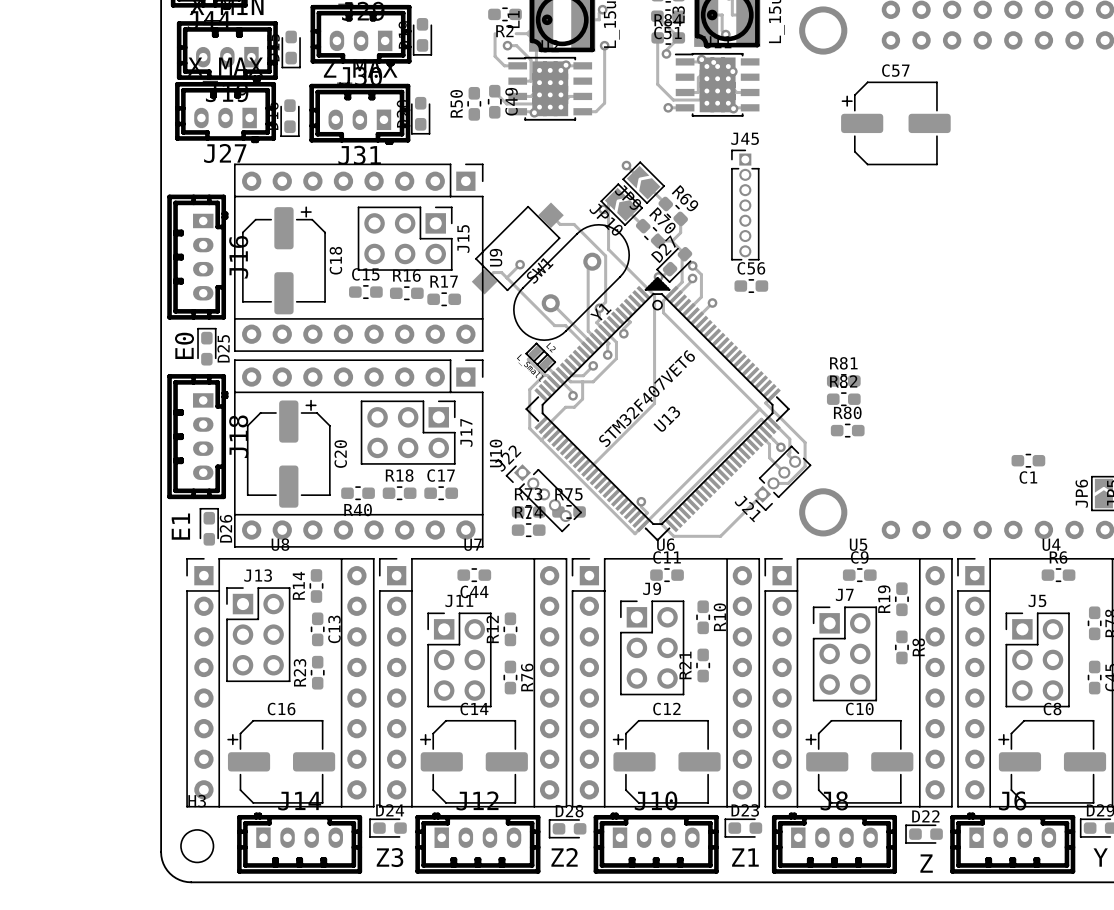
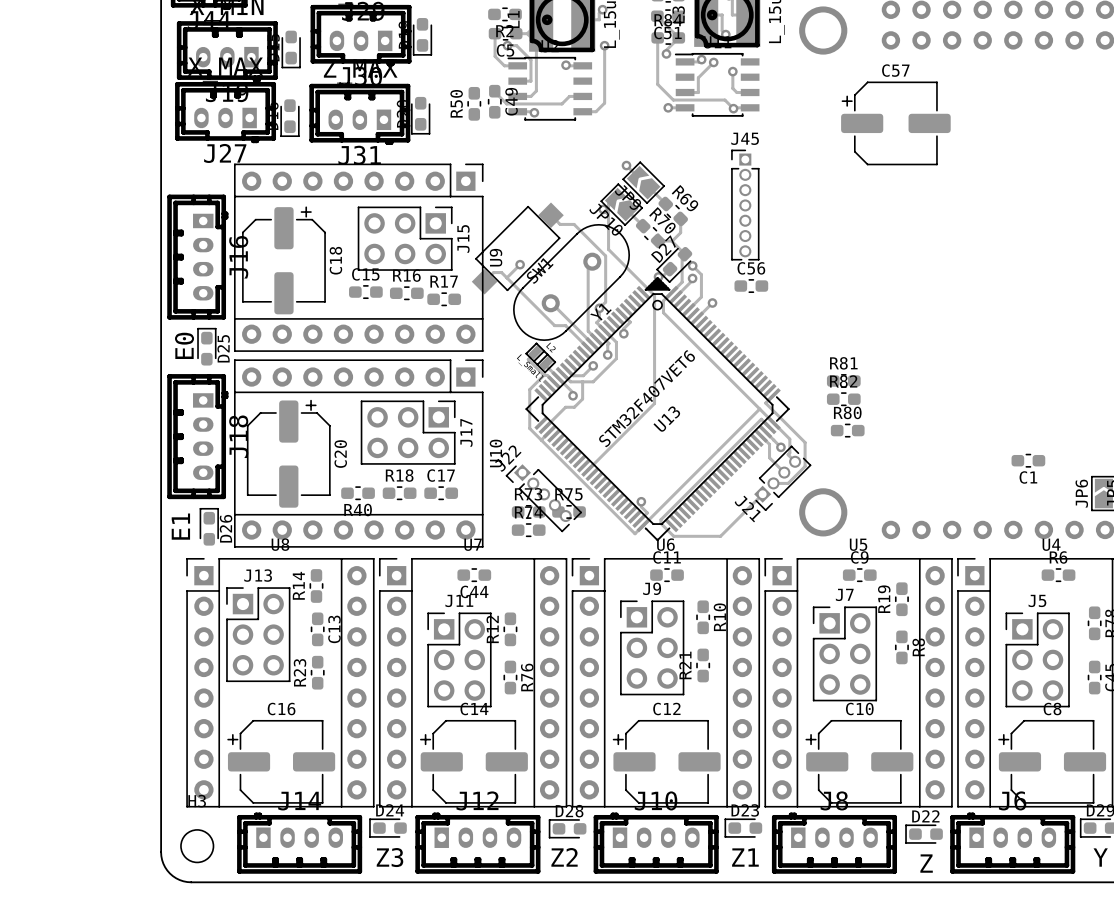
C5: none -> (505, 33)
part footprint: [674, 52, 760, 117] -> [674, 52, 760, 117]
part footprint: [507, 56, 593, 121] -> [507, 56, 593, 121]

